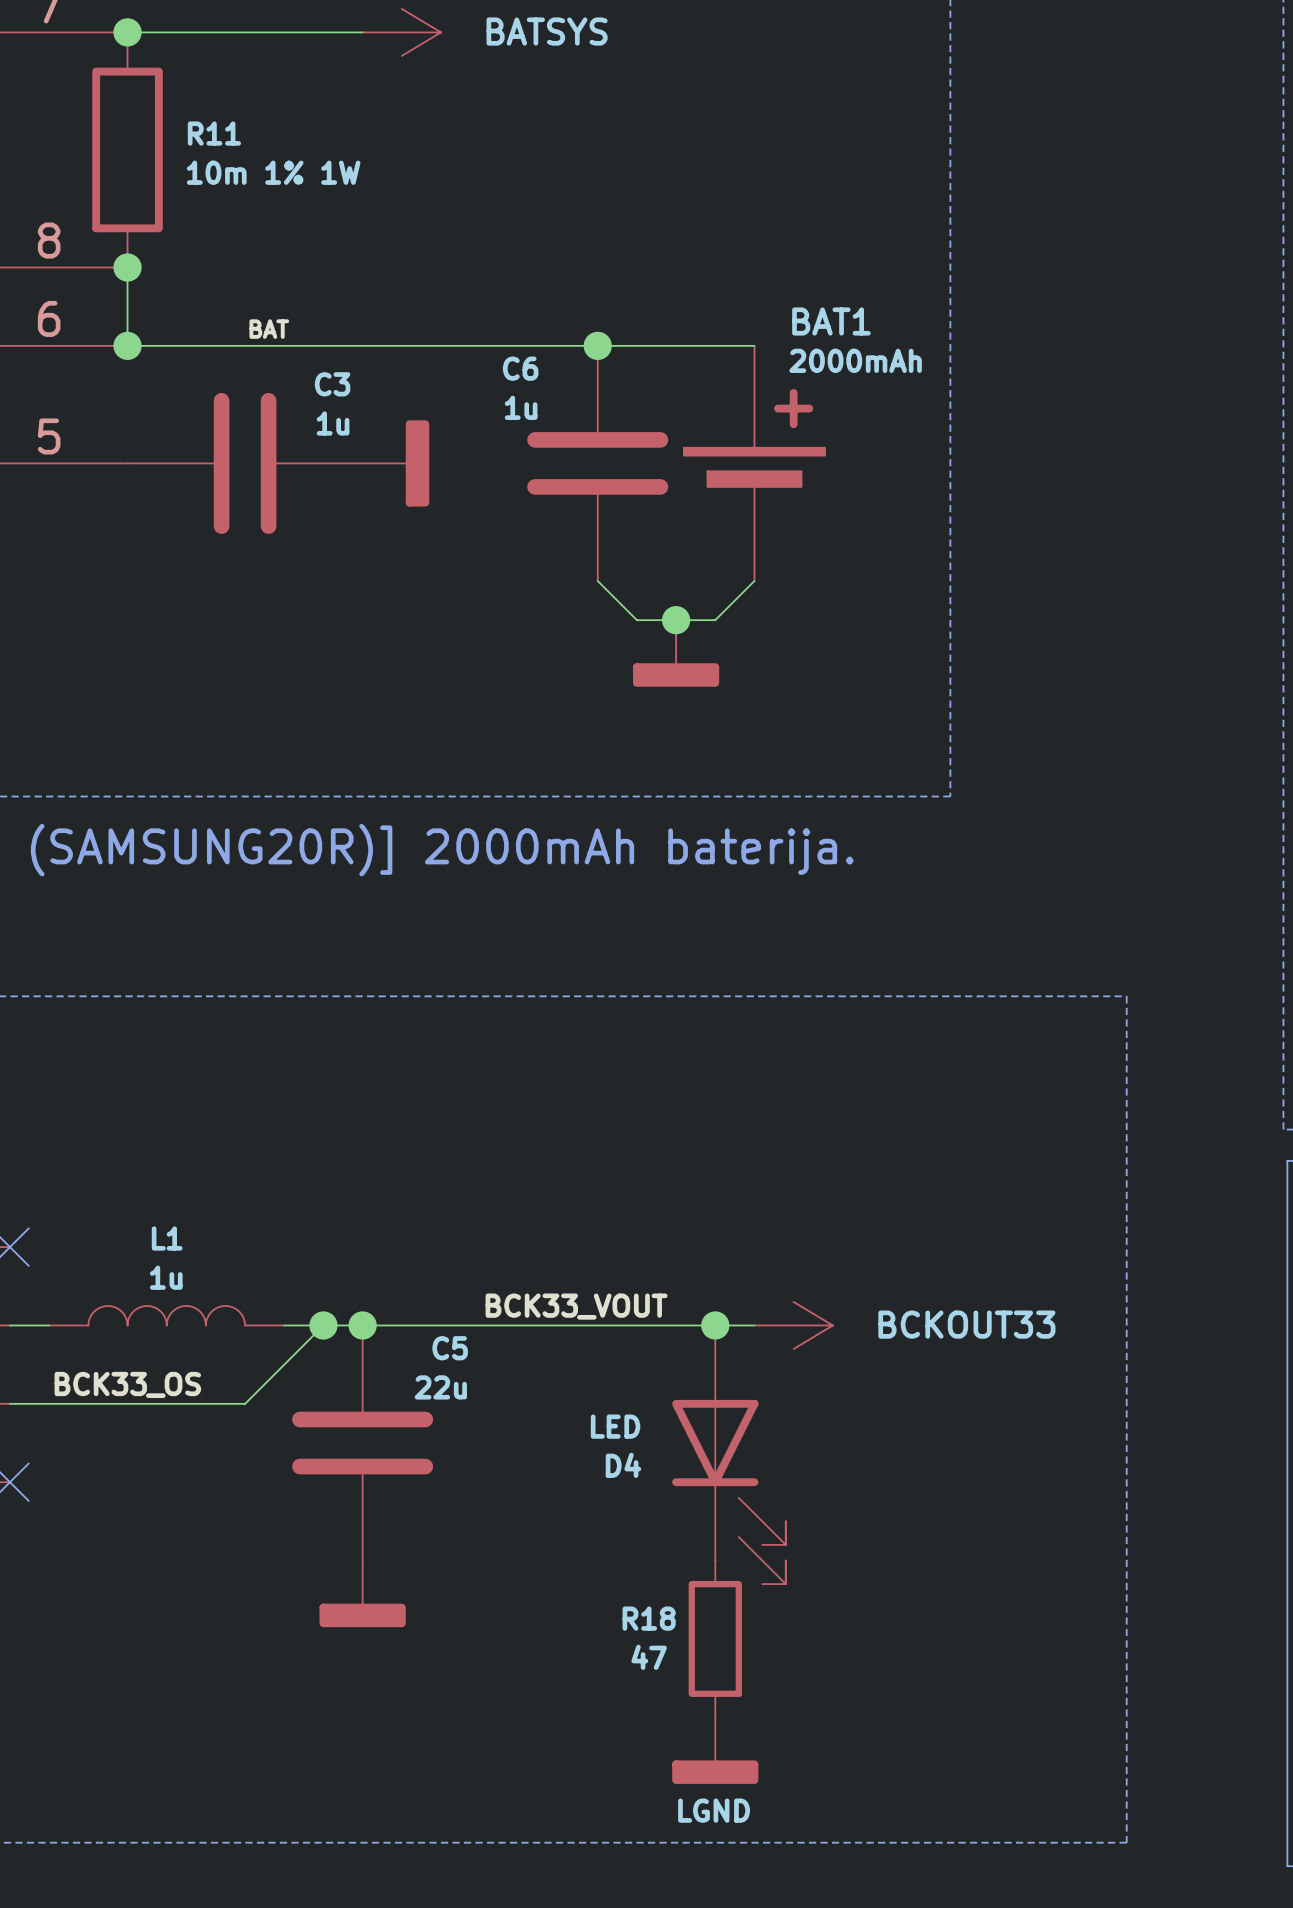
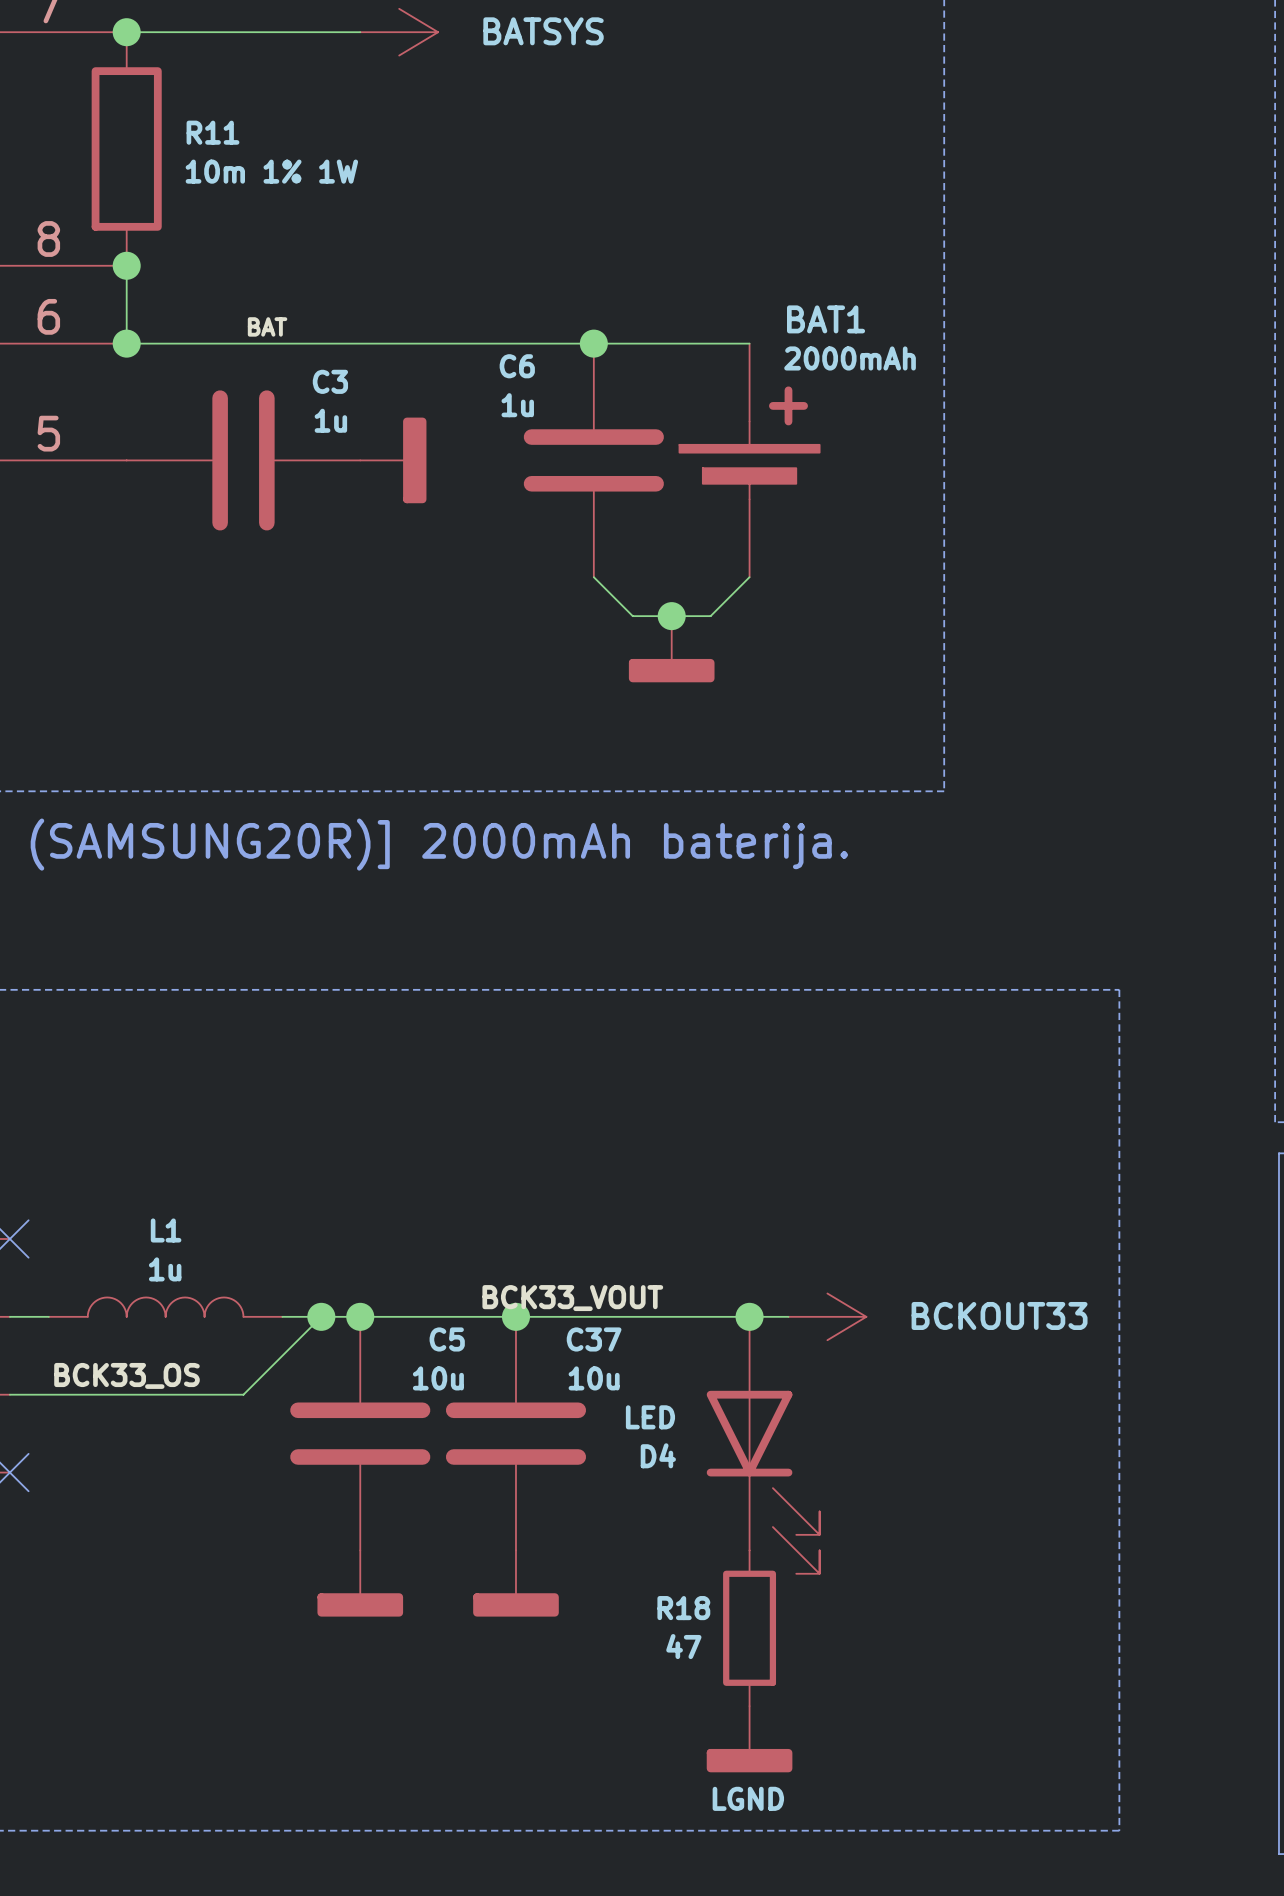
junction: none -> (515, 1316)
junction position: (715, 1325) -> (749, 1316)
power symbol position: BCKOUT33 (793, 1325) -> BCKOUT33 (827, 1316)
C5 value: 22u (440, 1387) -> 10u (438, 1378)
C37: none -> 10u (515, 1433)
D4 position: (729, 1454) -> (763, 1445)
power symbol: none -> (515, 1583)
R18 position: (715, 1638) -> (749, 1628)
power symbol position: LGND (715, 1750) -> LGND (749, 1739)

